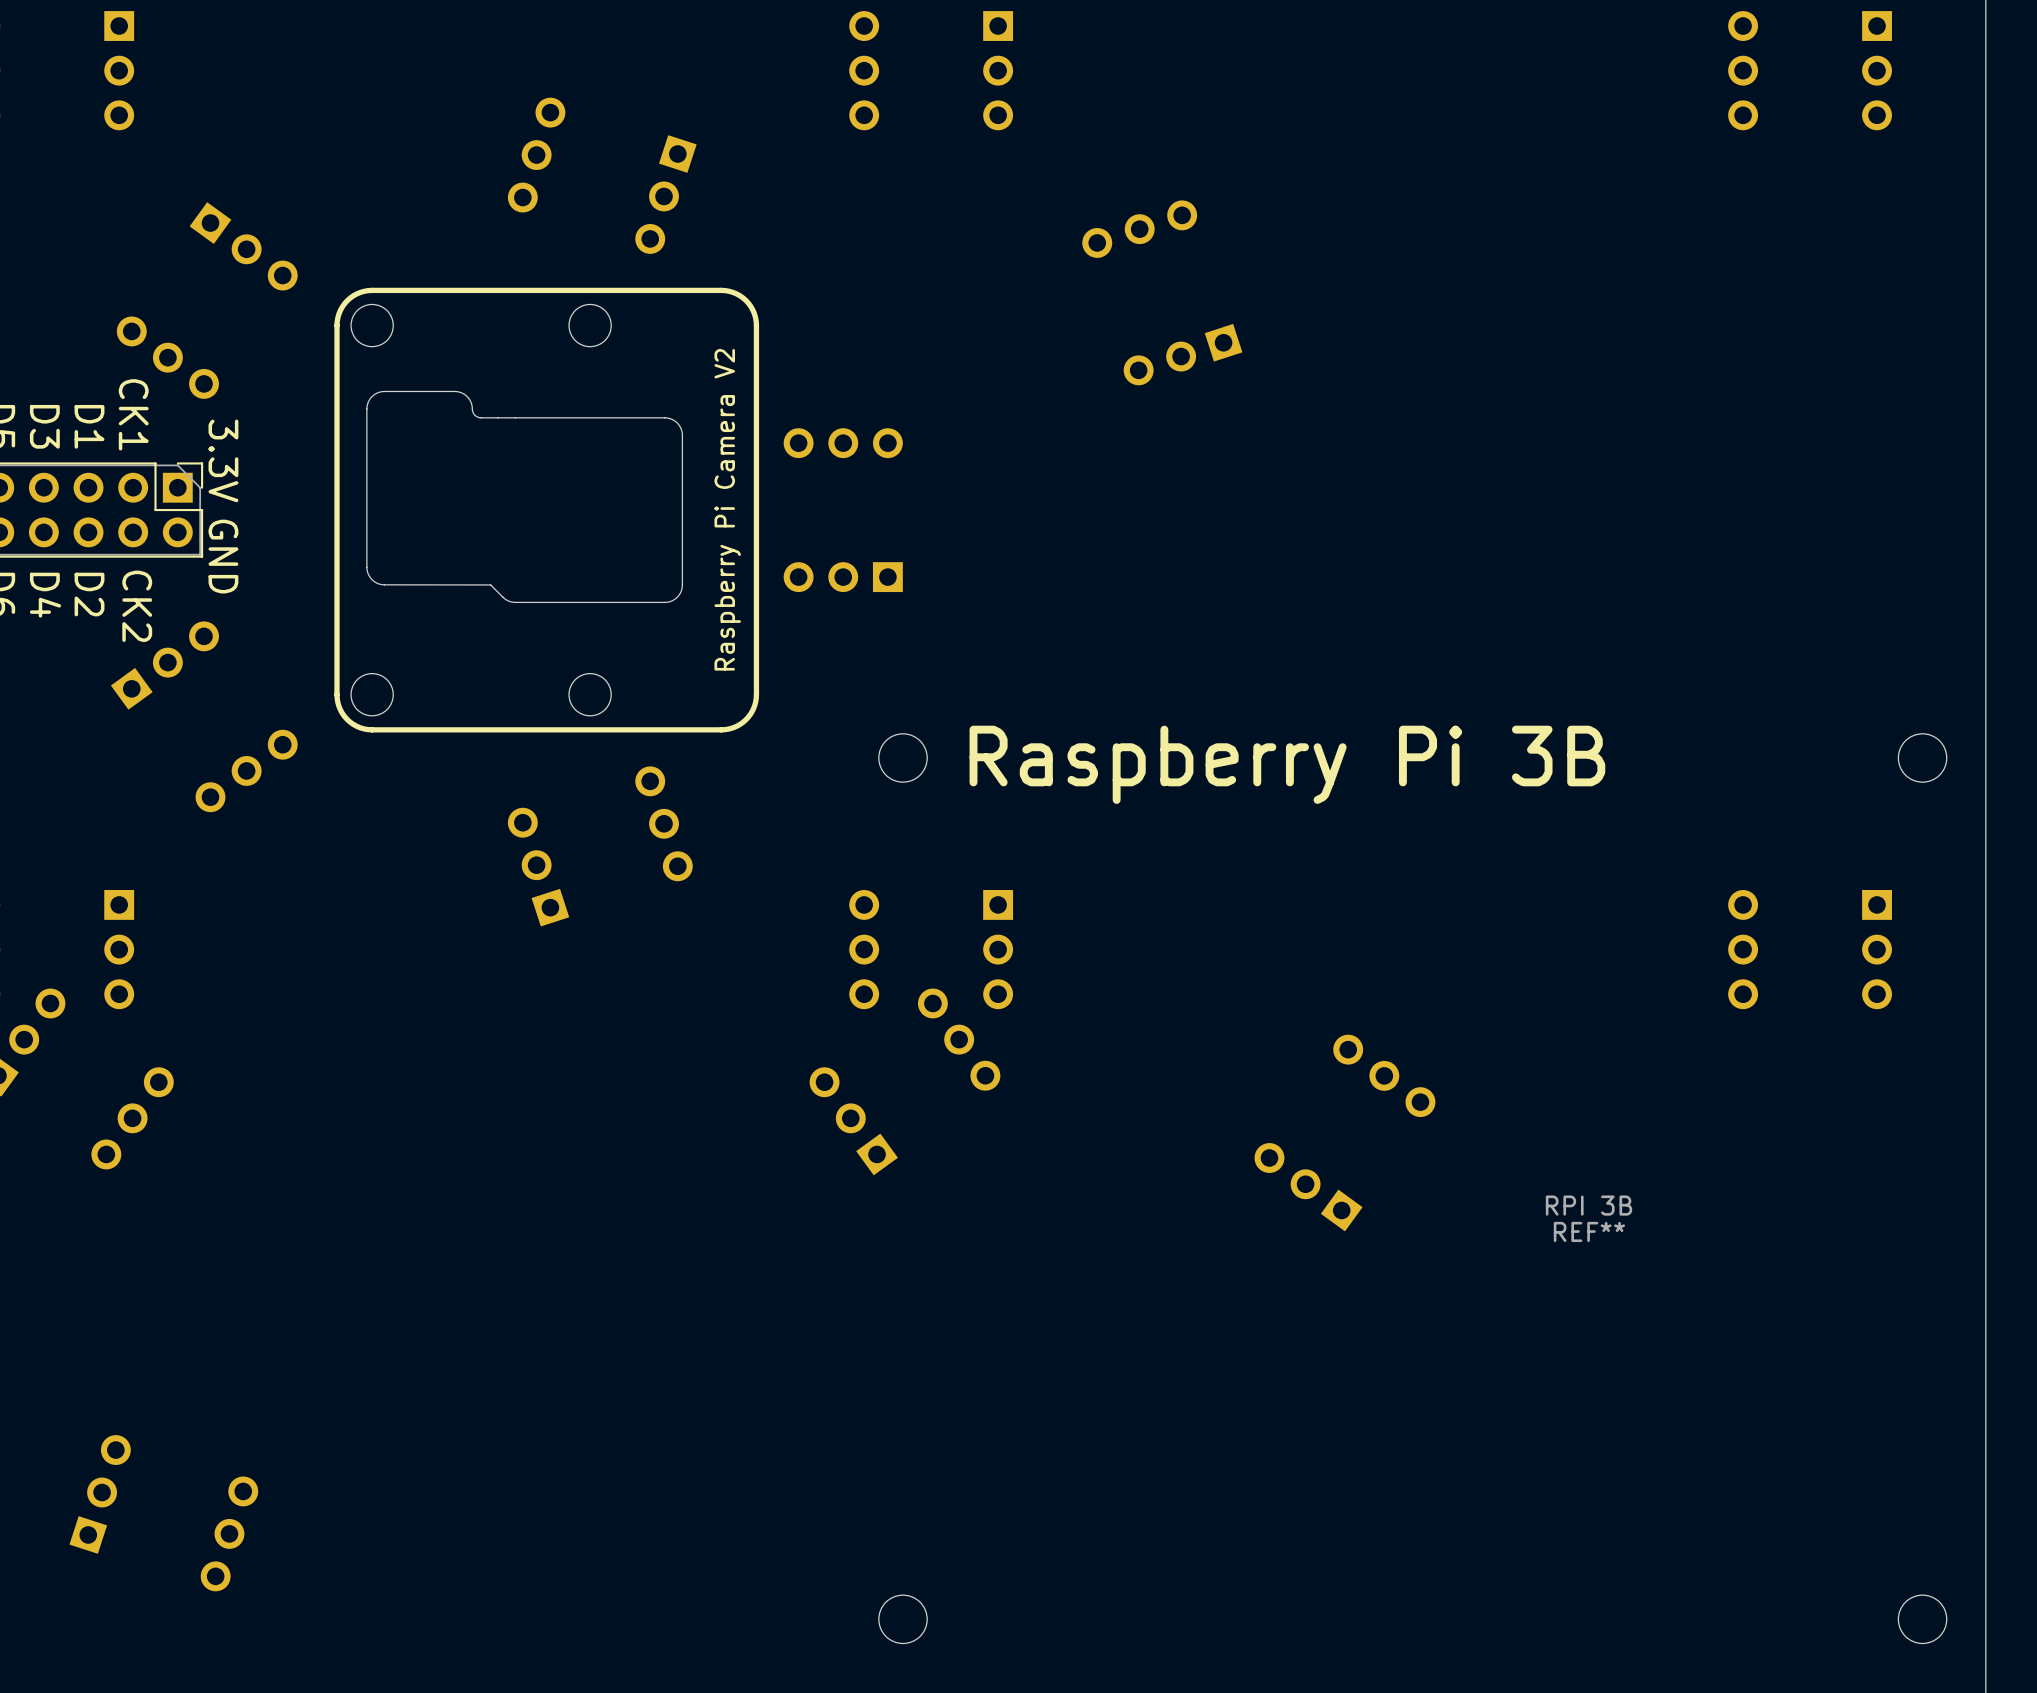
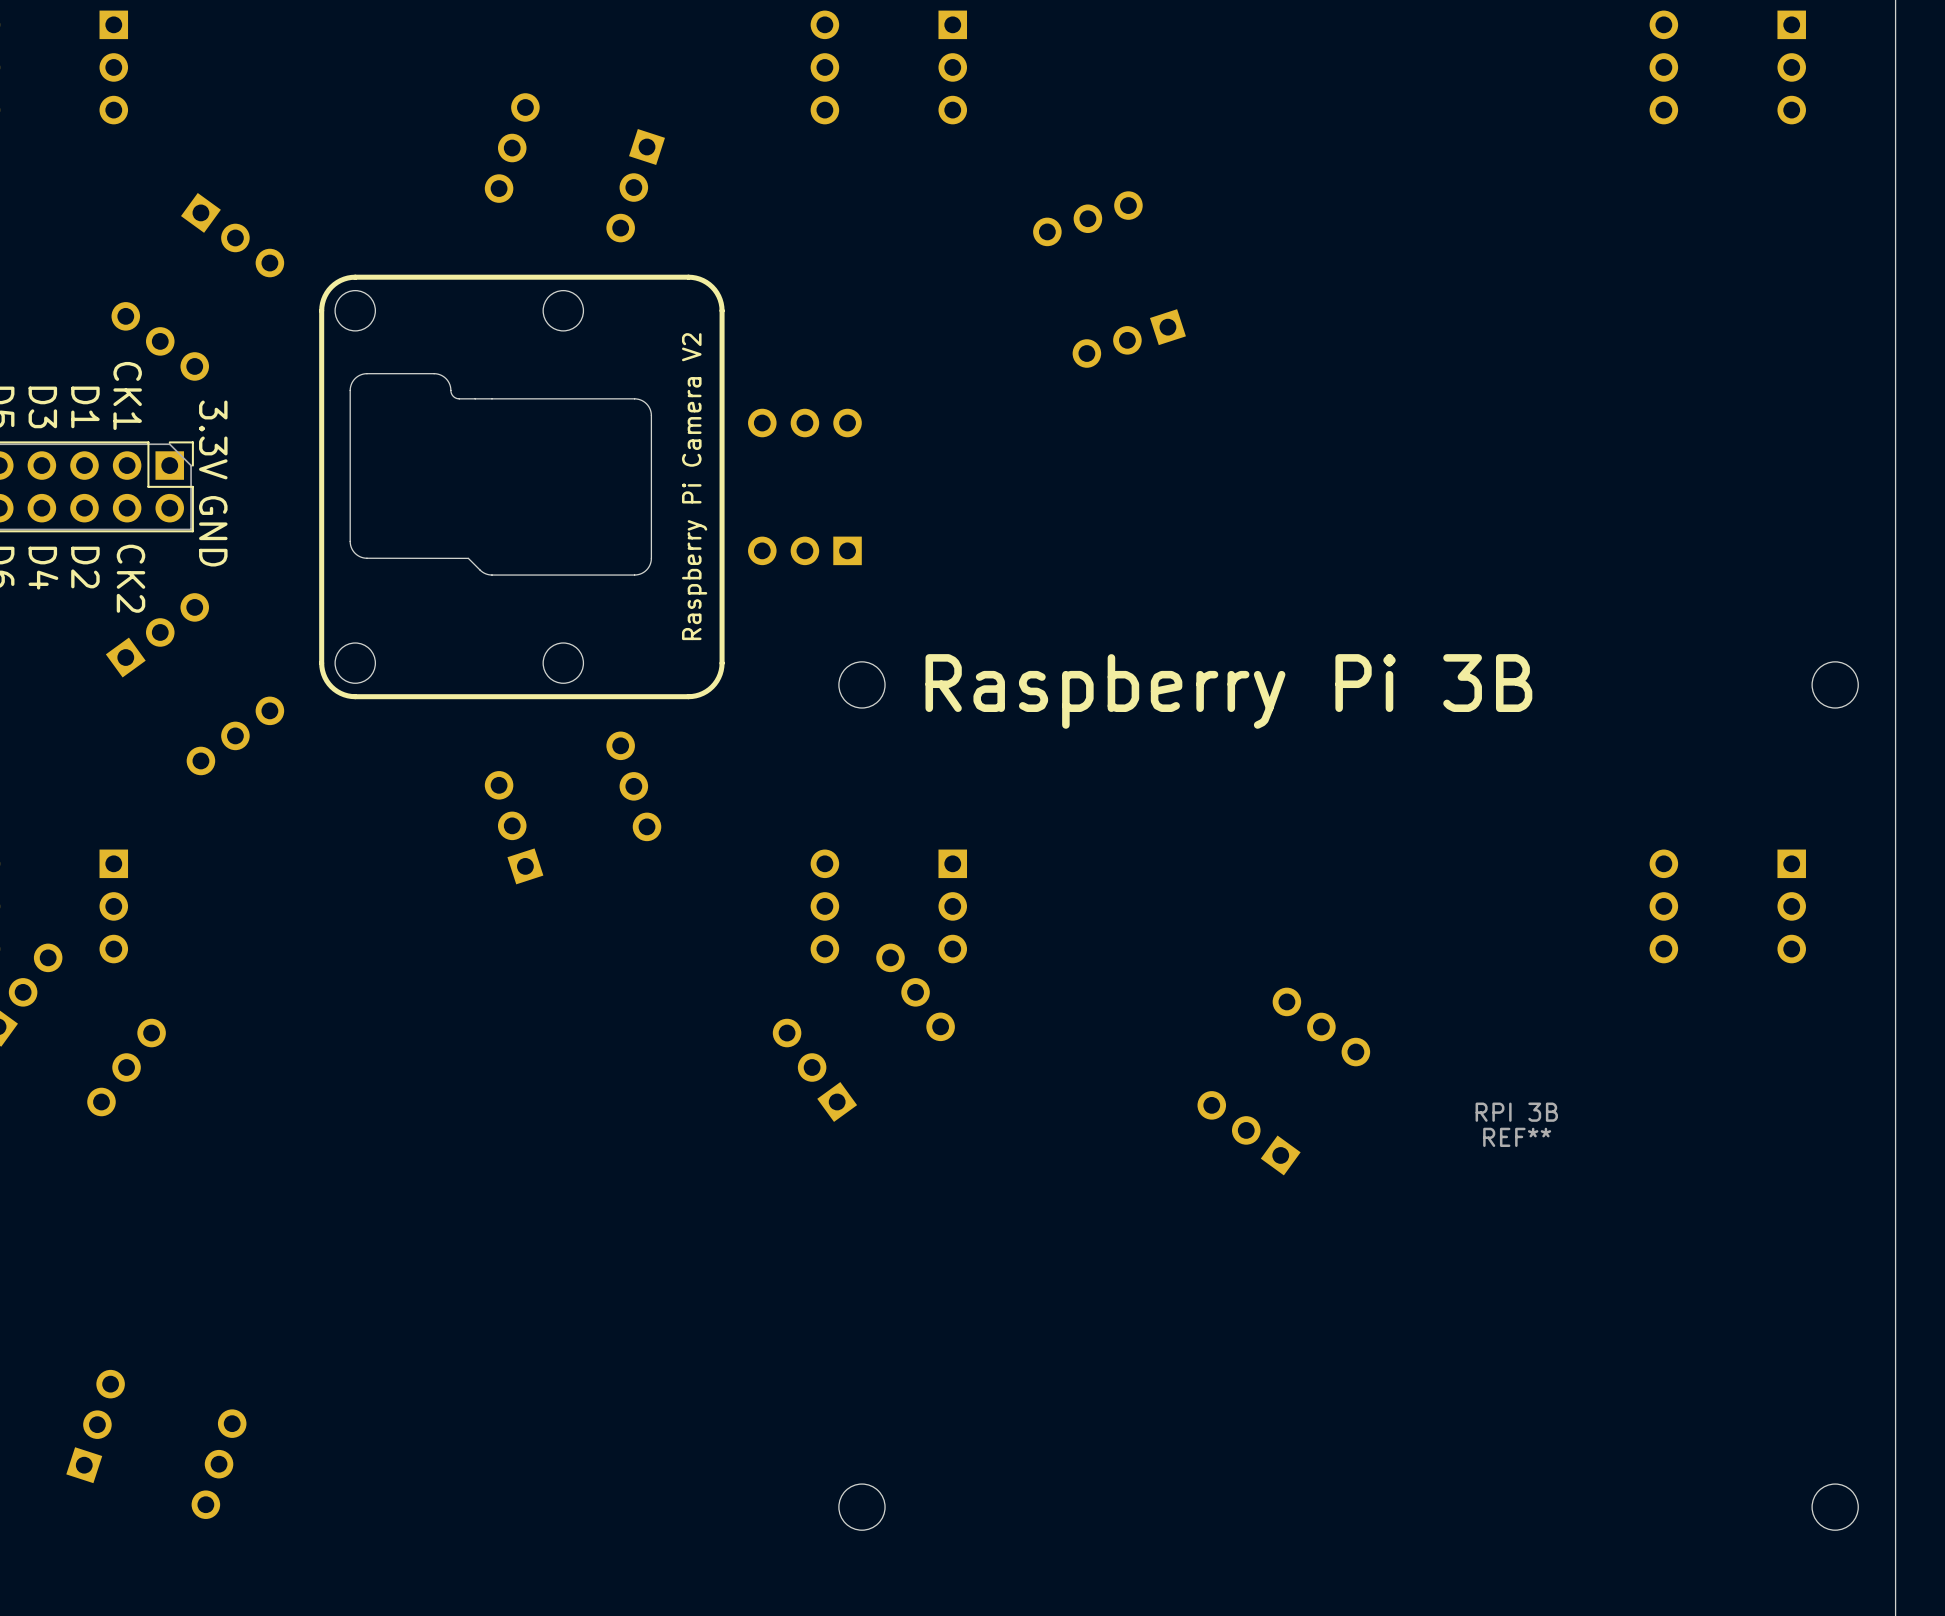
REF** position: (1412, 1188) -> (1348, 1096)

